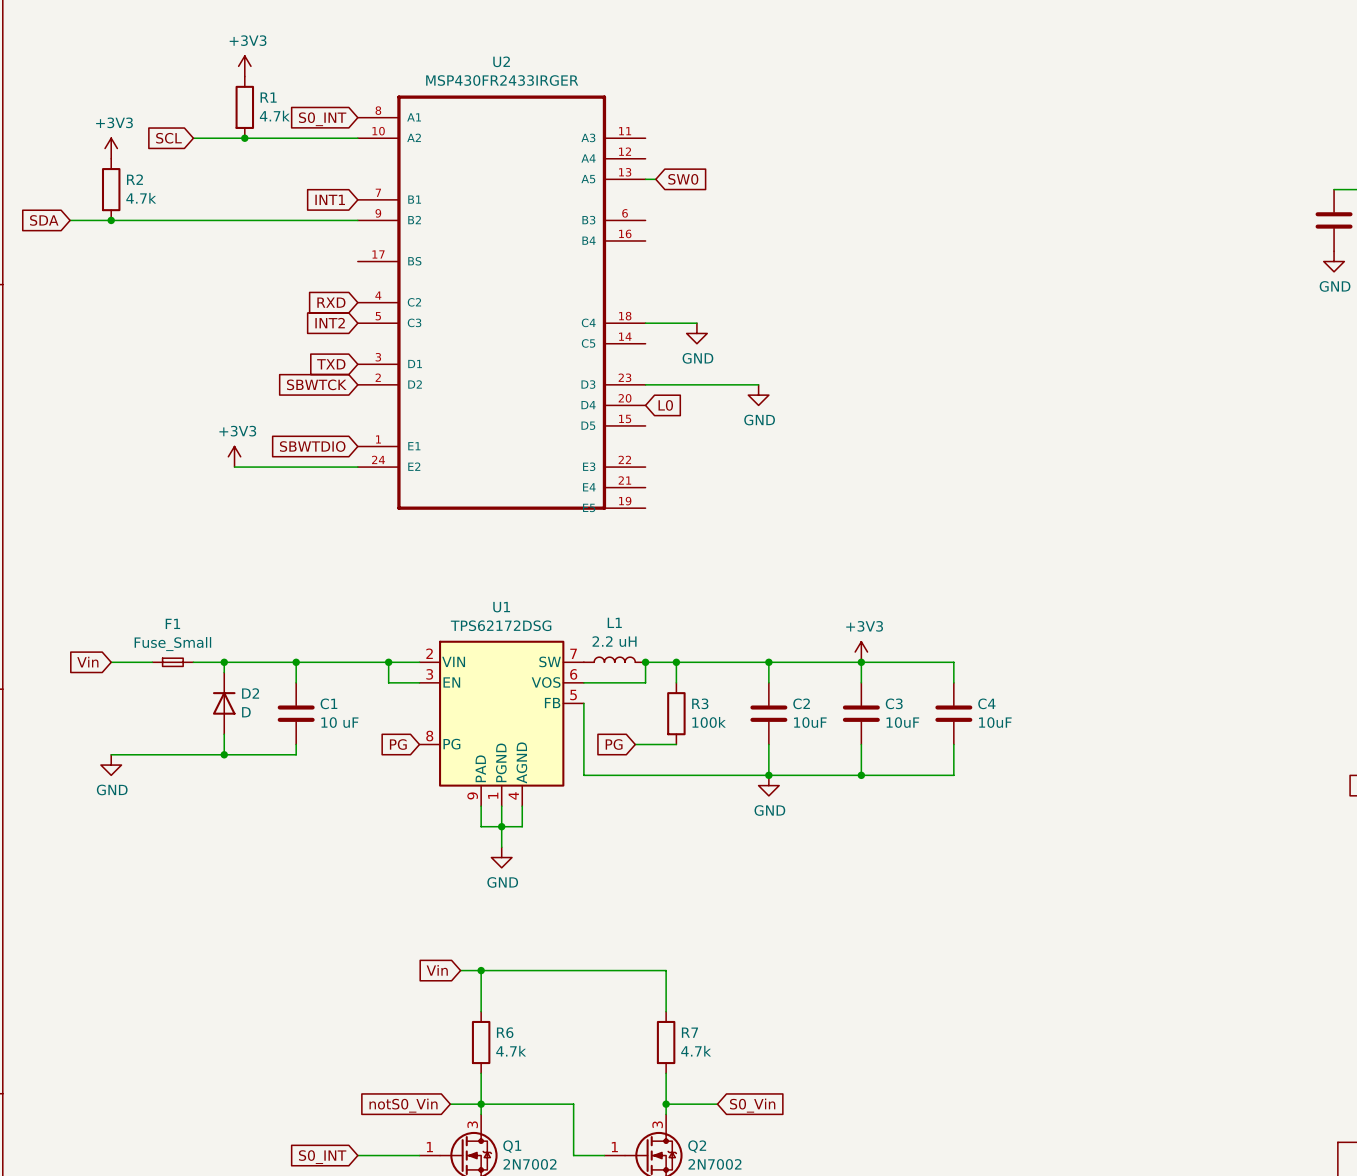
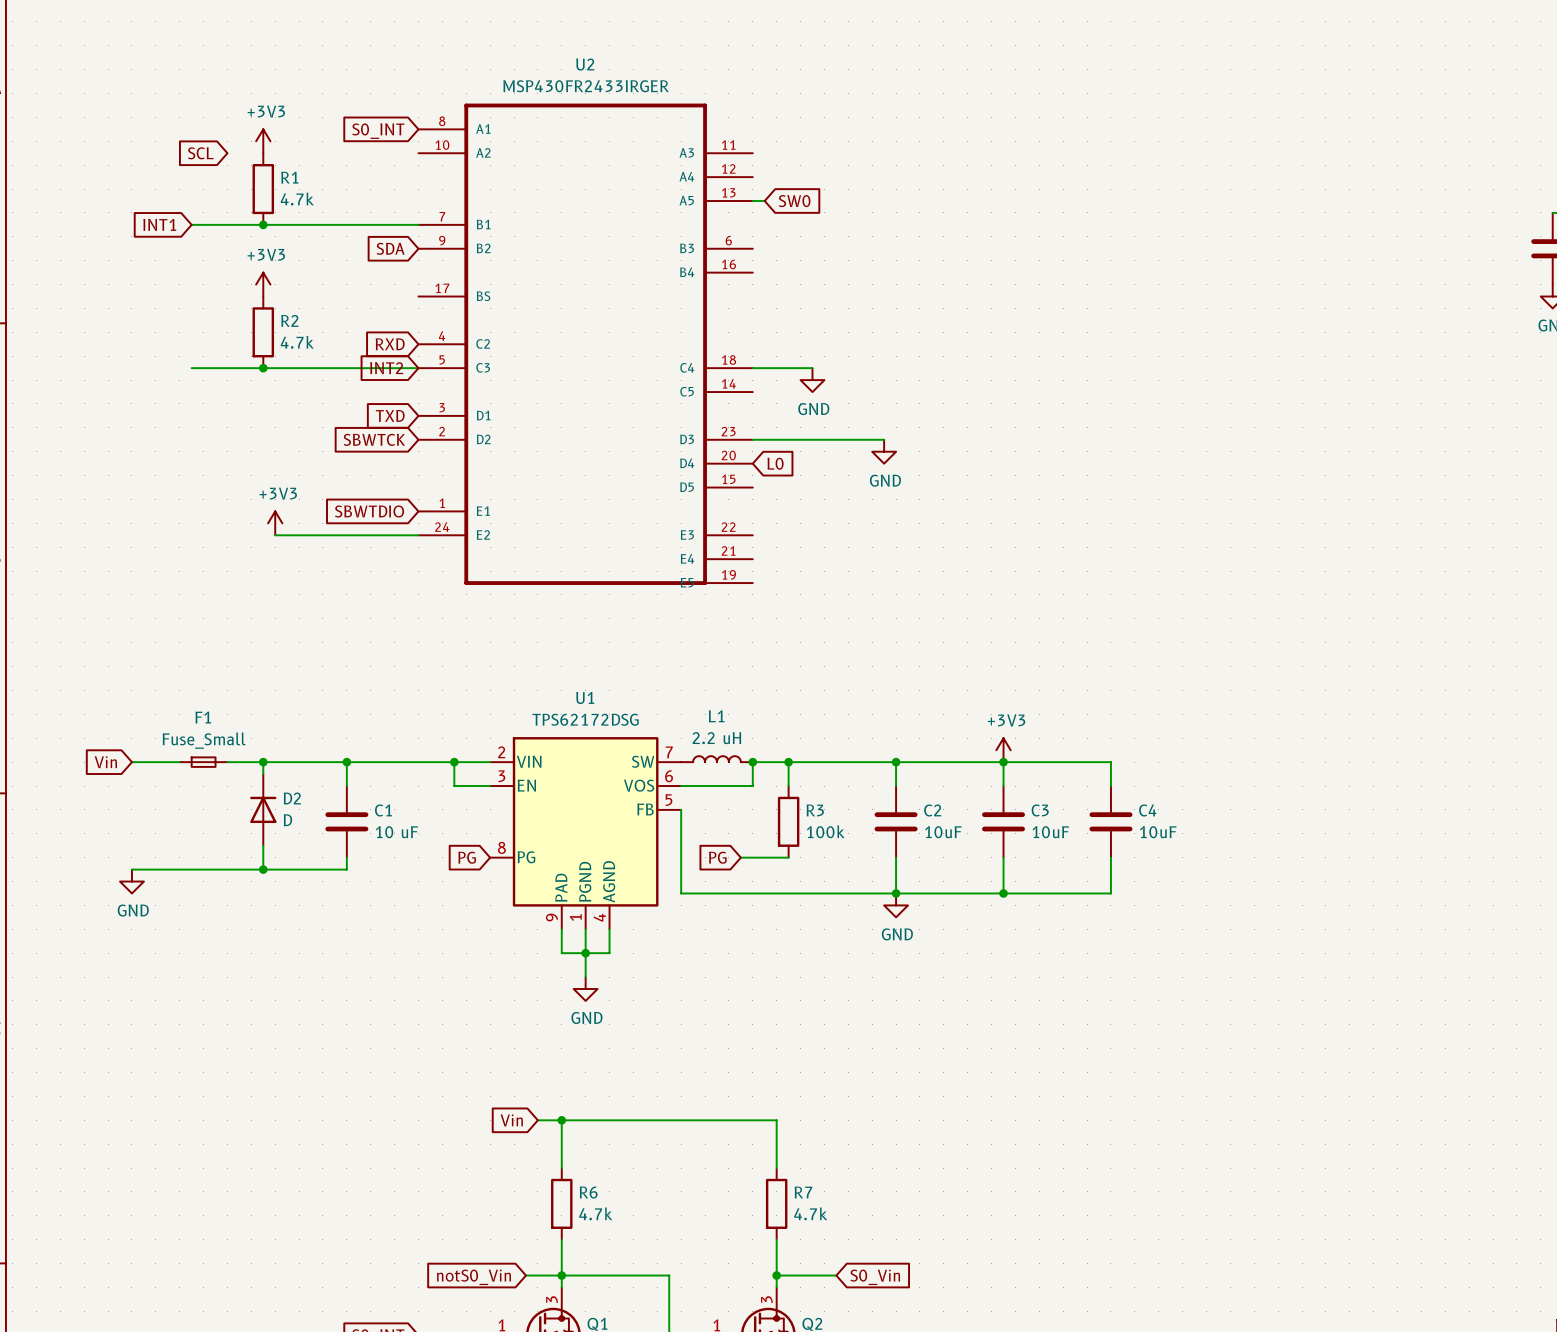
power symbol: +3V3 (244, 66) -> none
R1 position: (244, 107) -> (263, 189)
power symbol: none -> +3V3 (263, 141)
wire: (193, 138) (357, 138) -> none
junction: (244, 138) -> none
power symbol: +3V3 (111, 148) -> none
R2 position: (111, 189) -> (263, 332)
wire: none -> (191, 224) (418, 224)
junction: none -> (263, 224)
global label position: INT1 (330, 199) -> INT1 (159, 224)
global label: SDA (44, 220) -> none
wire: (70, 220) (357, 220) -> none
junction: (111, 220) -> none
global label: none -> SDA (390, 248)
power symbol: none -> +3V3 (263, 284)
wire: none -> (191, 368) (418, 368)
junction: none -> (263, 368)

